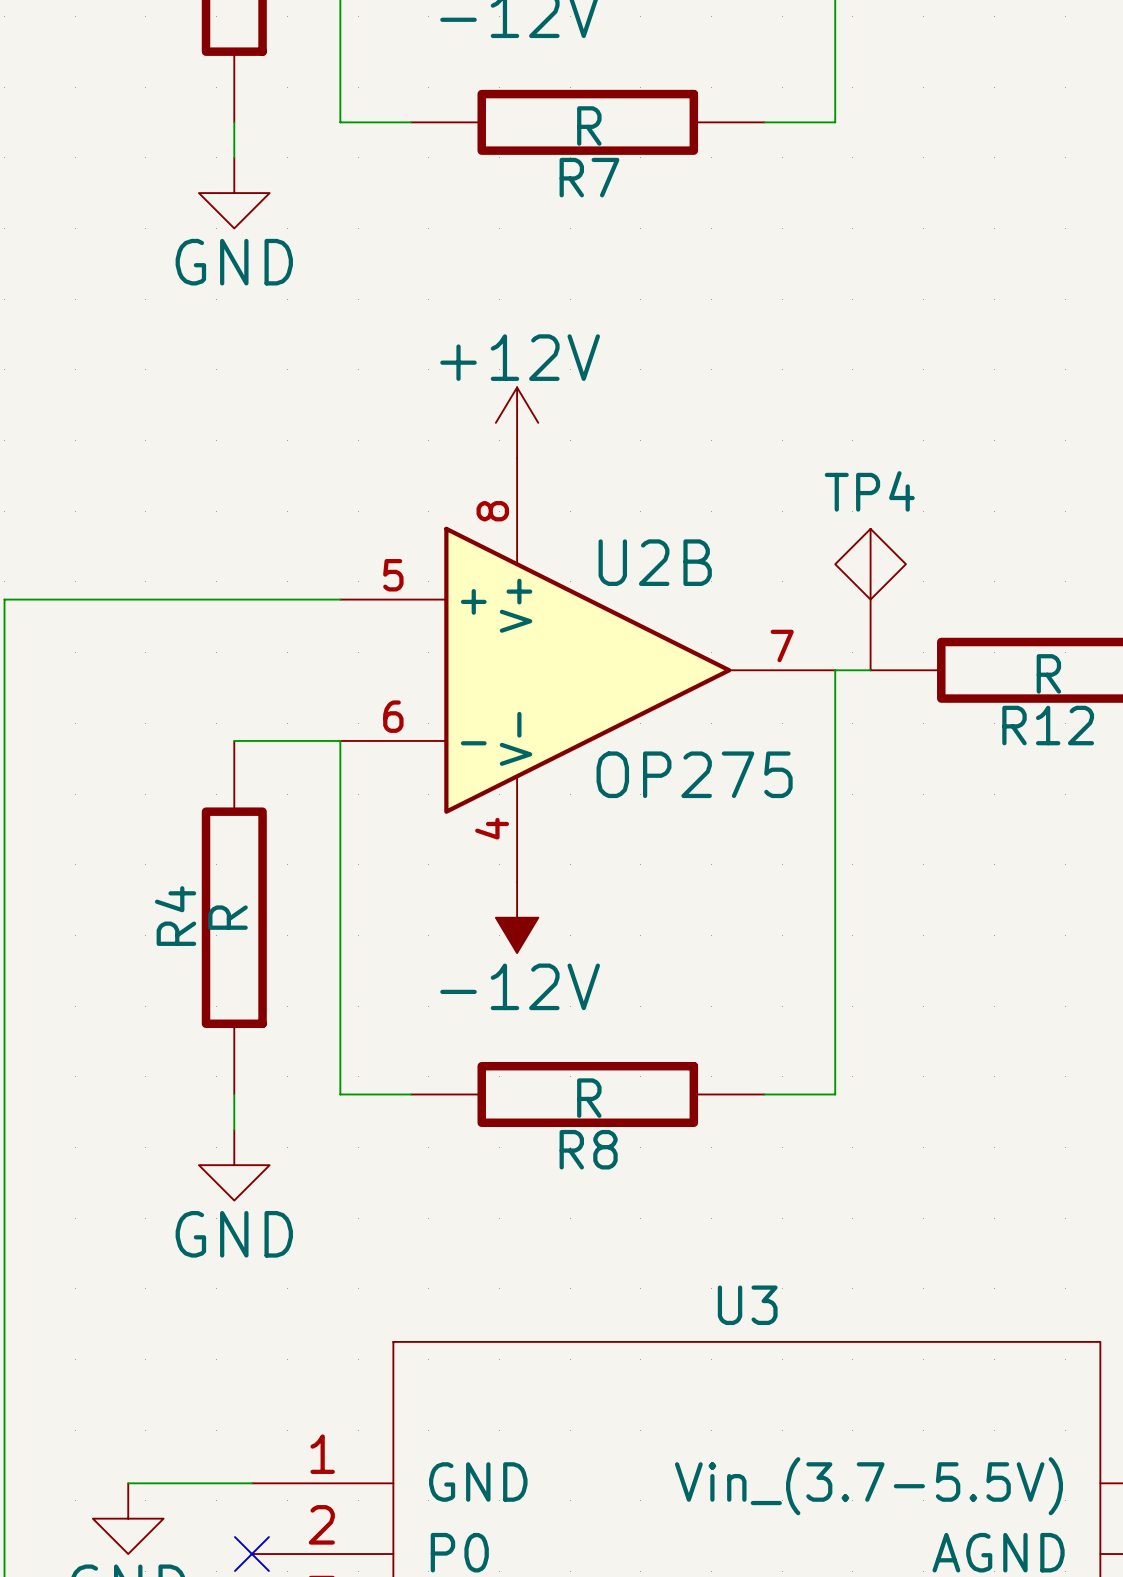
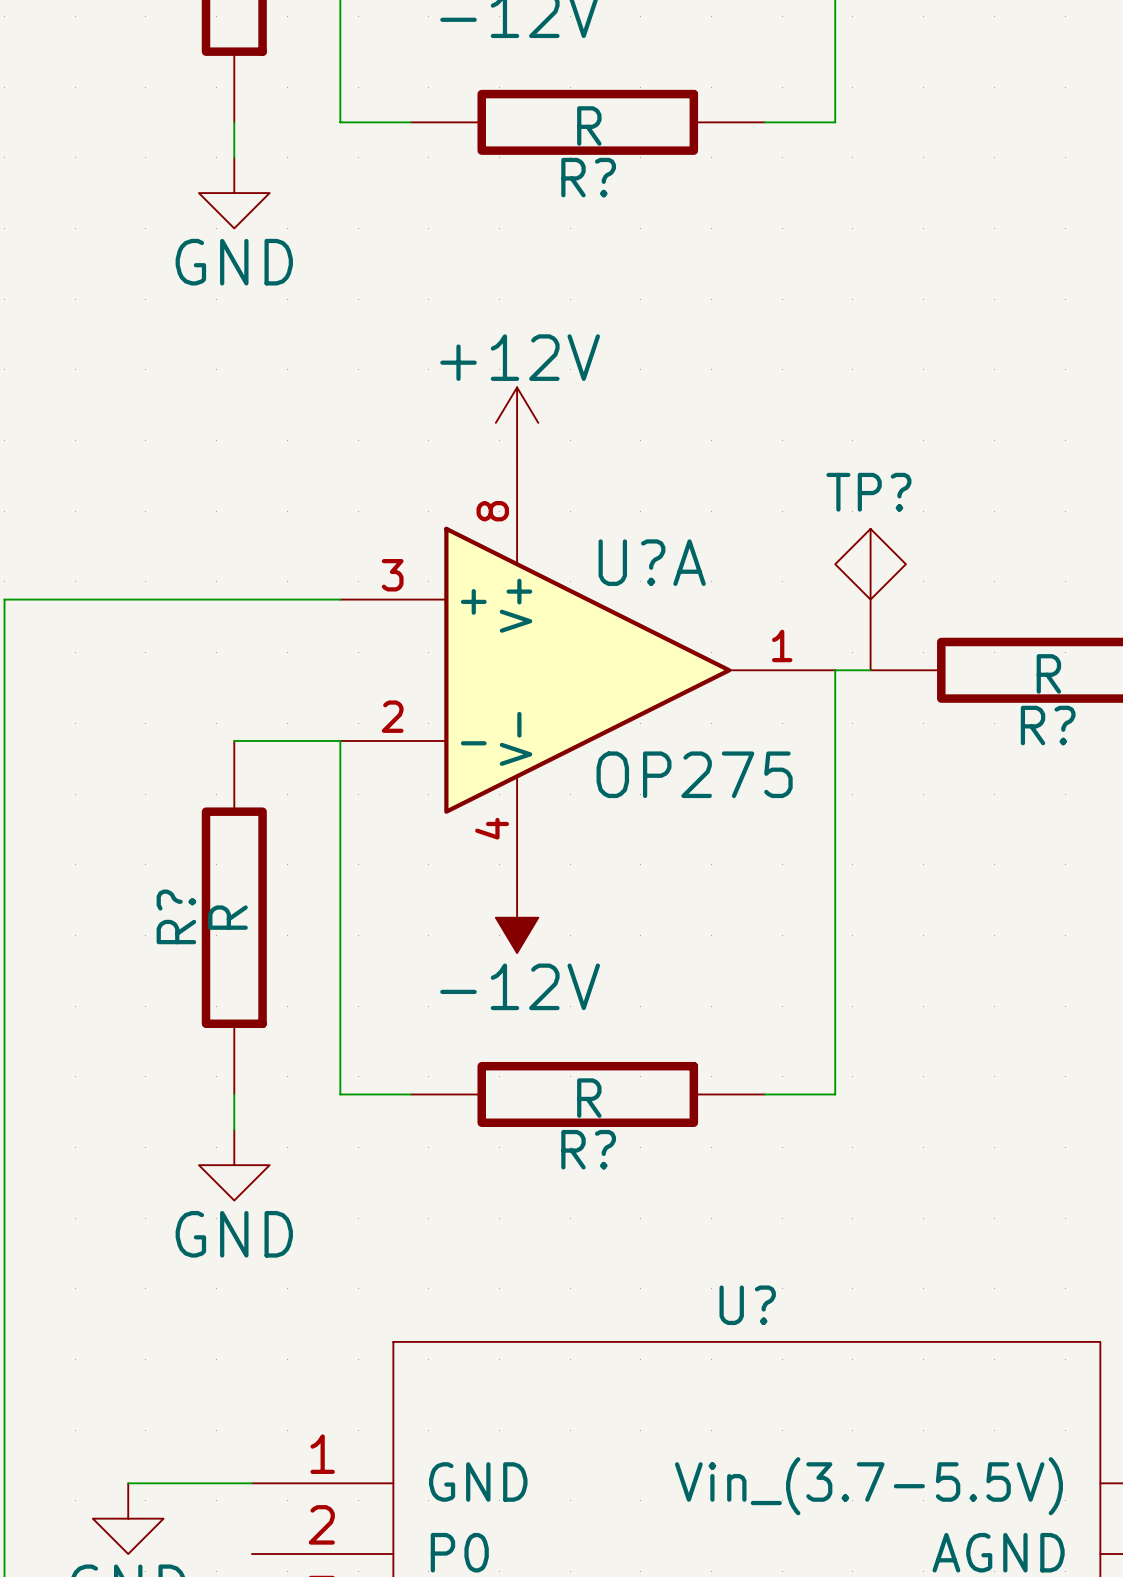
R7 name: R7 (589, 177) -> R? (588, 177)
TP4 name: TP4 (869, 491) -> TP? (868, 492)
U2B name: U2B (655, 562) -> U?A (652, 562)
U2B pin number: 5 (393, 575) -> 3 (392, 575)
U2B pin number: 7 (782, 645) -> 1 (782, 645)
U2B pin number: 6 (393, 716) -> 2 (392, 716)
R12 name: R12 (1048, 725) -> R? (1048, 725)
R4 name: R4 (175, 916) -> R? (176, 916)
R8 name: R8 (588, 1149) -> R? (588, 1149)
U3 name: U3 (747, 1305) -> U? (747, 1305)
no-connect mark: (251, 1554) -> none

